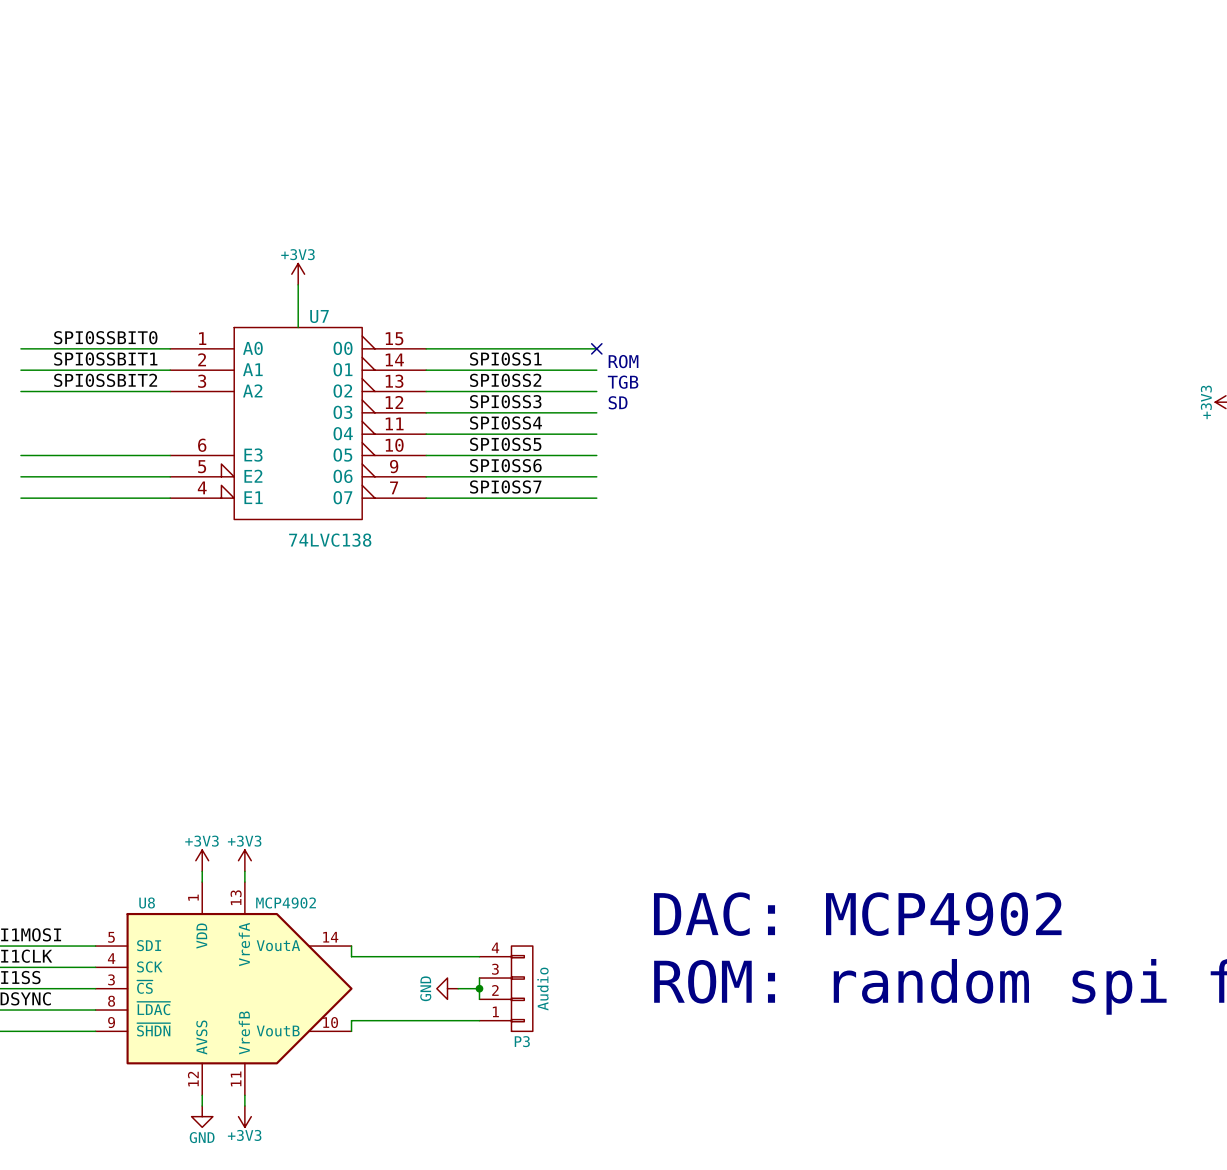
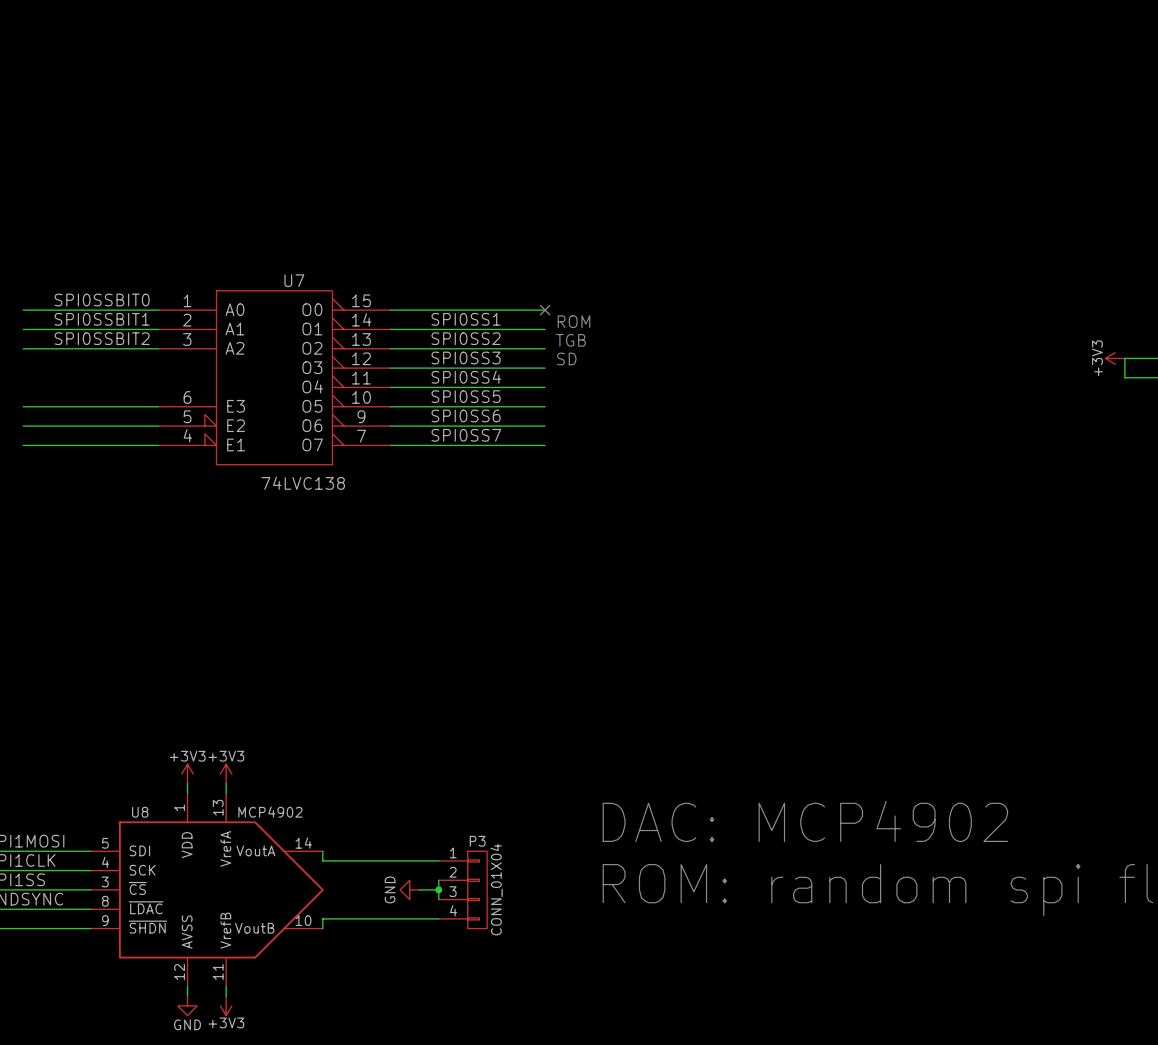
power symbol: +3V3 (298, 274) -> none
wire: (298, 284) (298, 327) -> none
P3 flip: as is (522, 988) -> up-down (477, 889)
P3 value: Audio (542, 989) -> CONN_01X04 (496, 889)

